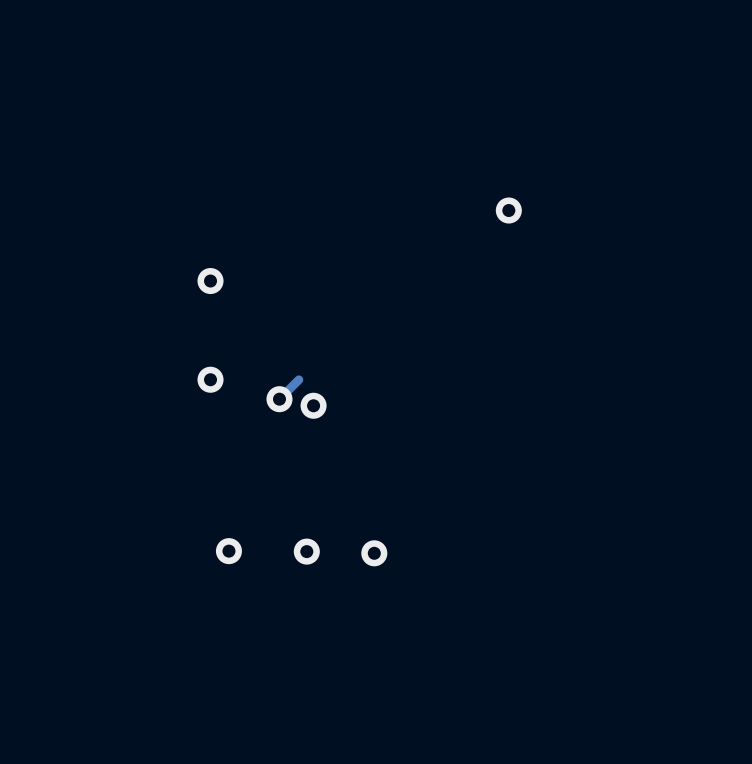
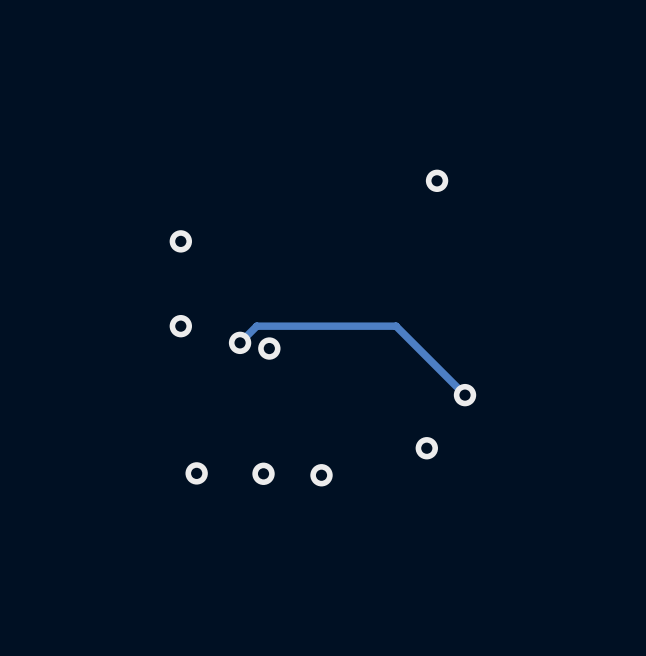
track: none -> (256, 326) (396, 326) (465, 395)
via: none -> (465, 395)
via: none -> (426, 448)

